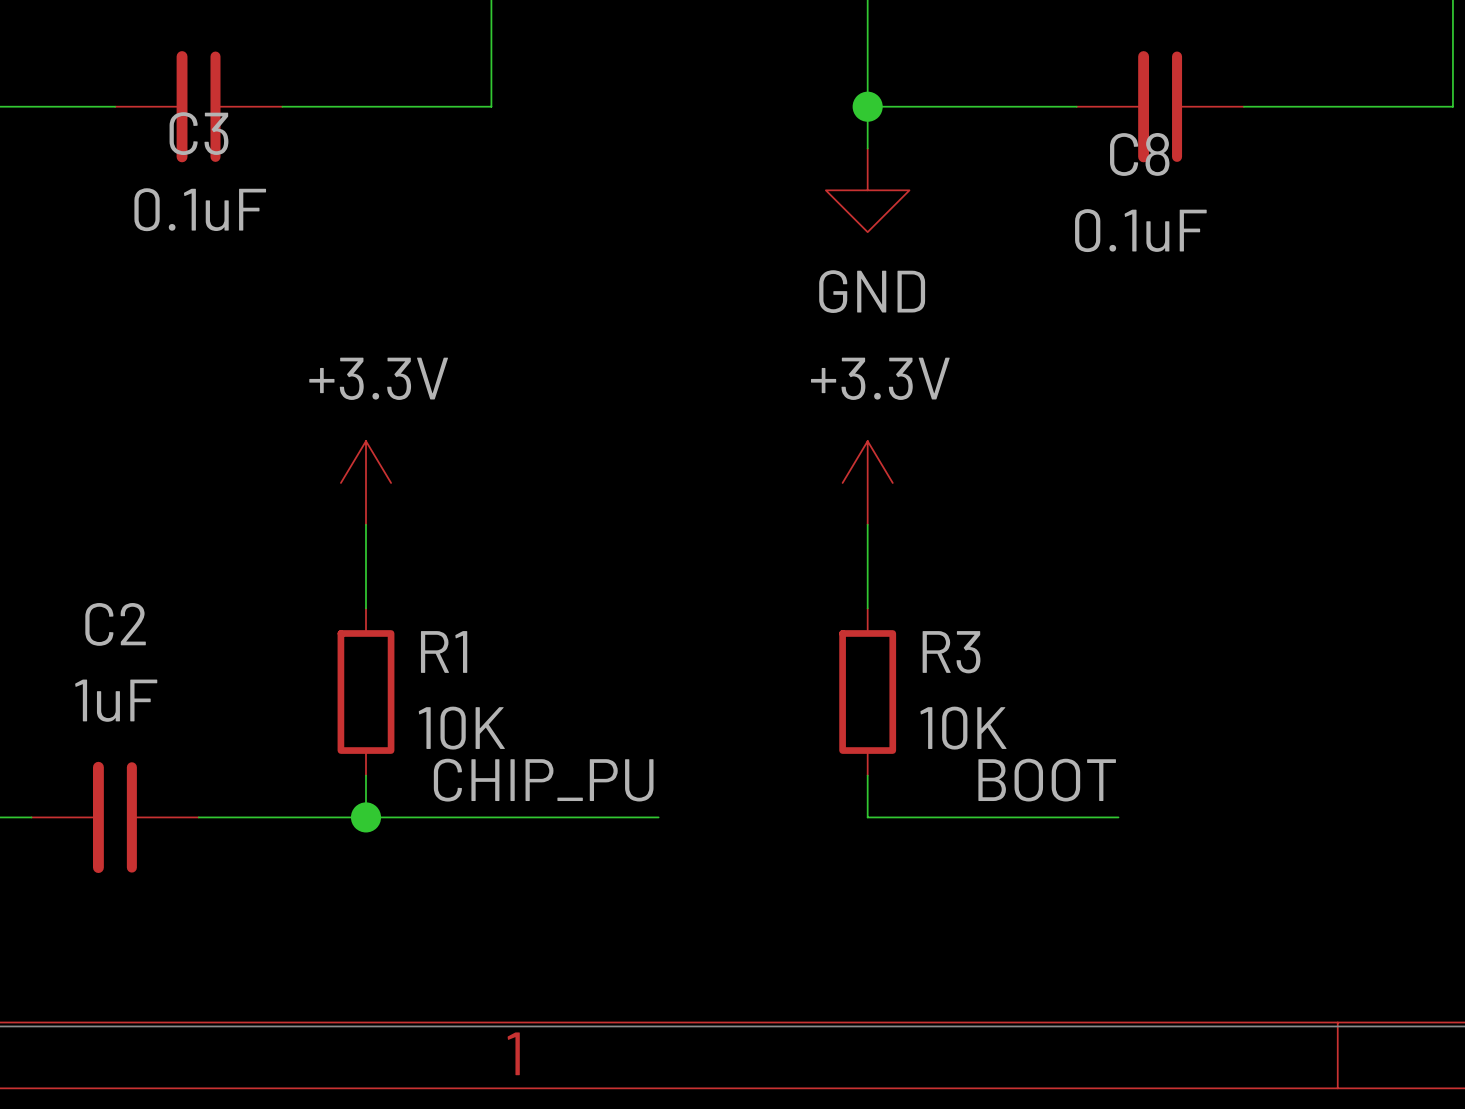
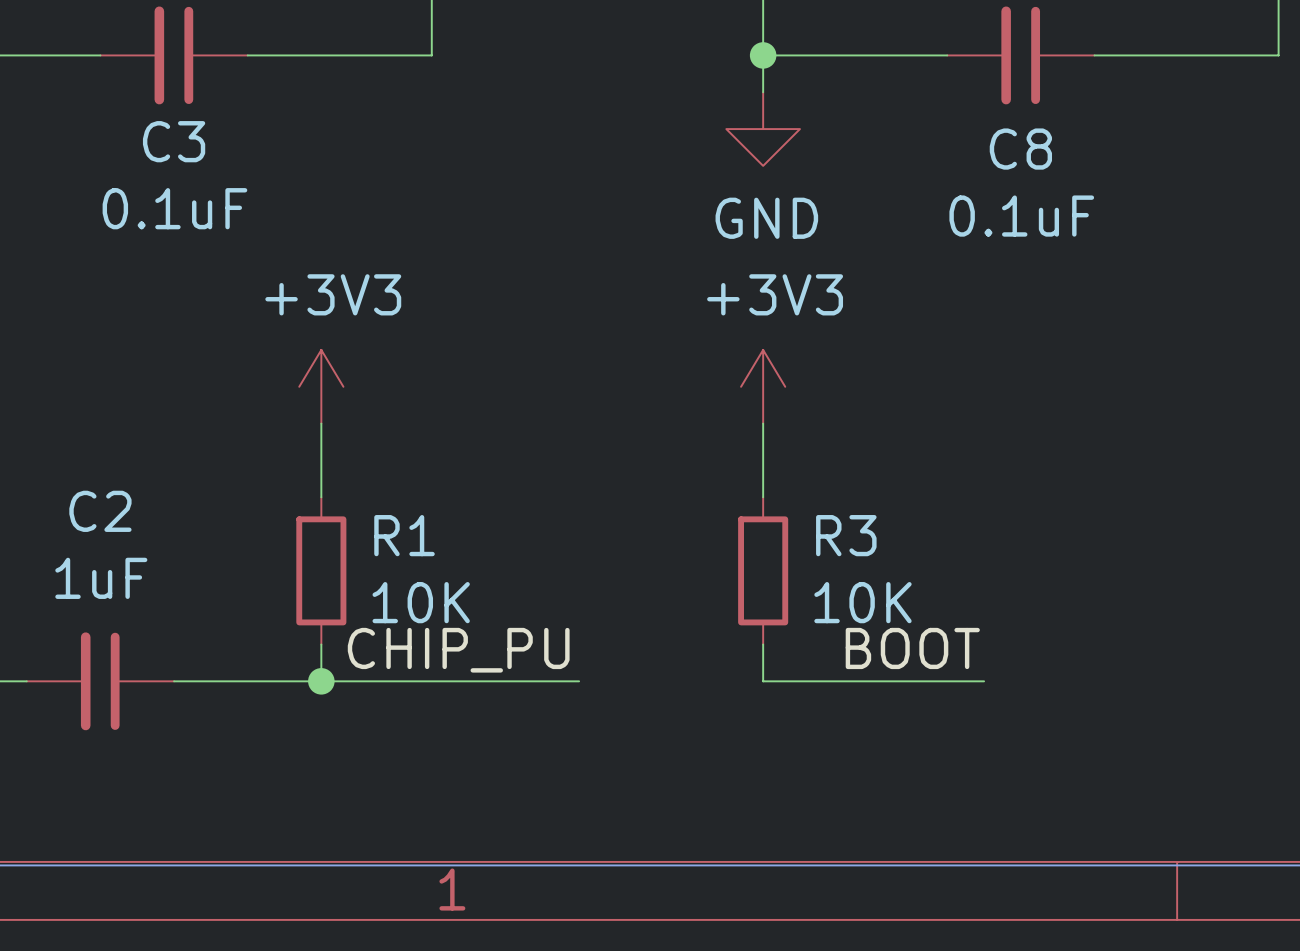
C3 name position: C3 (198, 133) -> C3 (174, 141)
C8 name position: C8 (1139, 154) -> C8 (1020, 149)
C3 value position: 0.1uF (200, 209) -> 0.1uF (174, 208)
C8 value position: 0.1uF (1140, 230) -> 0.1uF (1021, 216)
power symbol: +3.3V (365, 482) -> +3V3 (321, 386)
power symbol: +3.3V (867, 482) -> +3V3 (763, 386)

